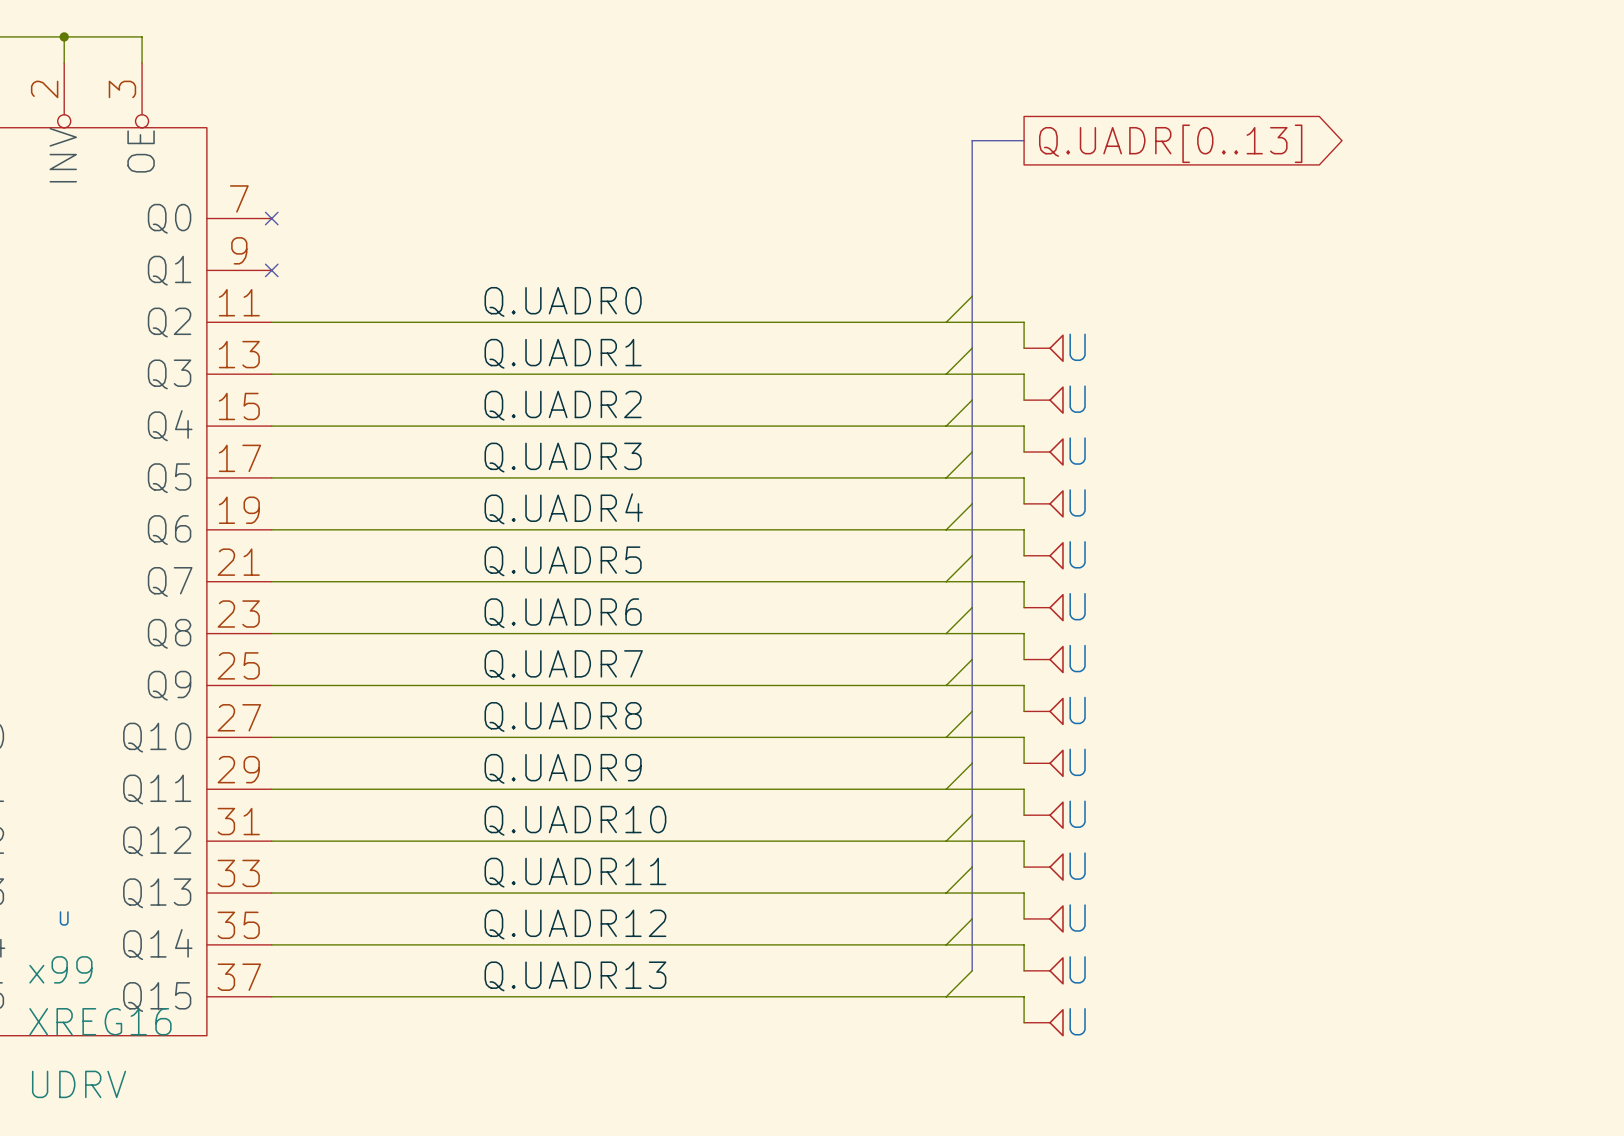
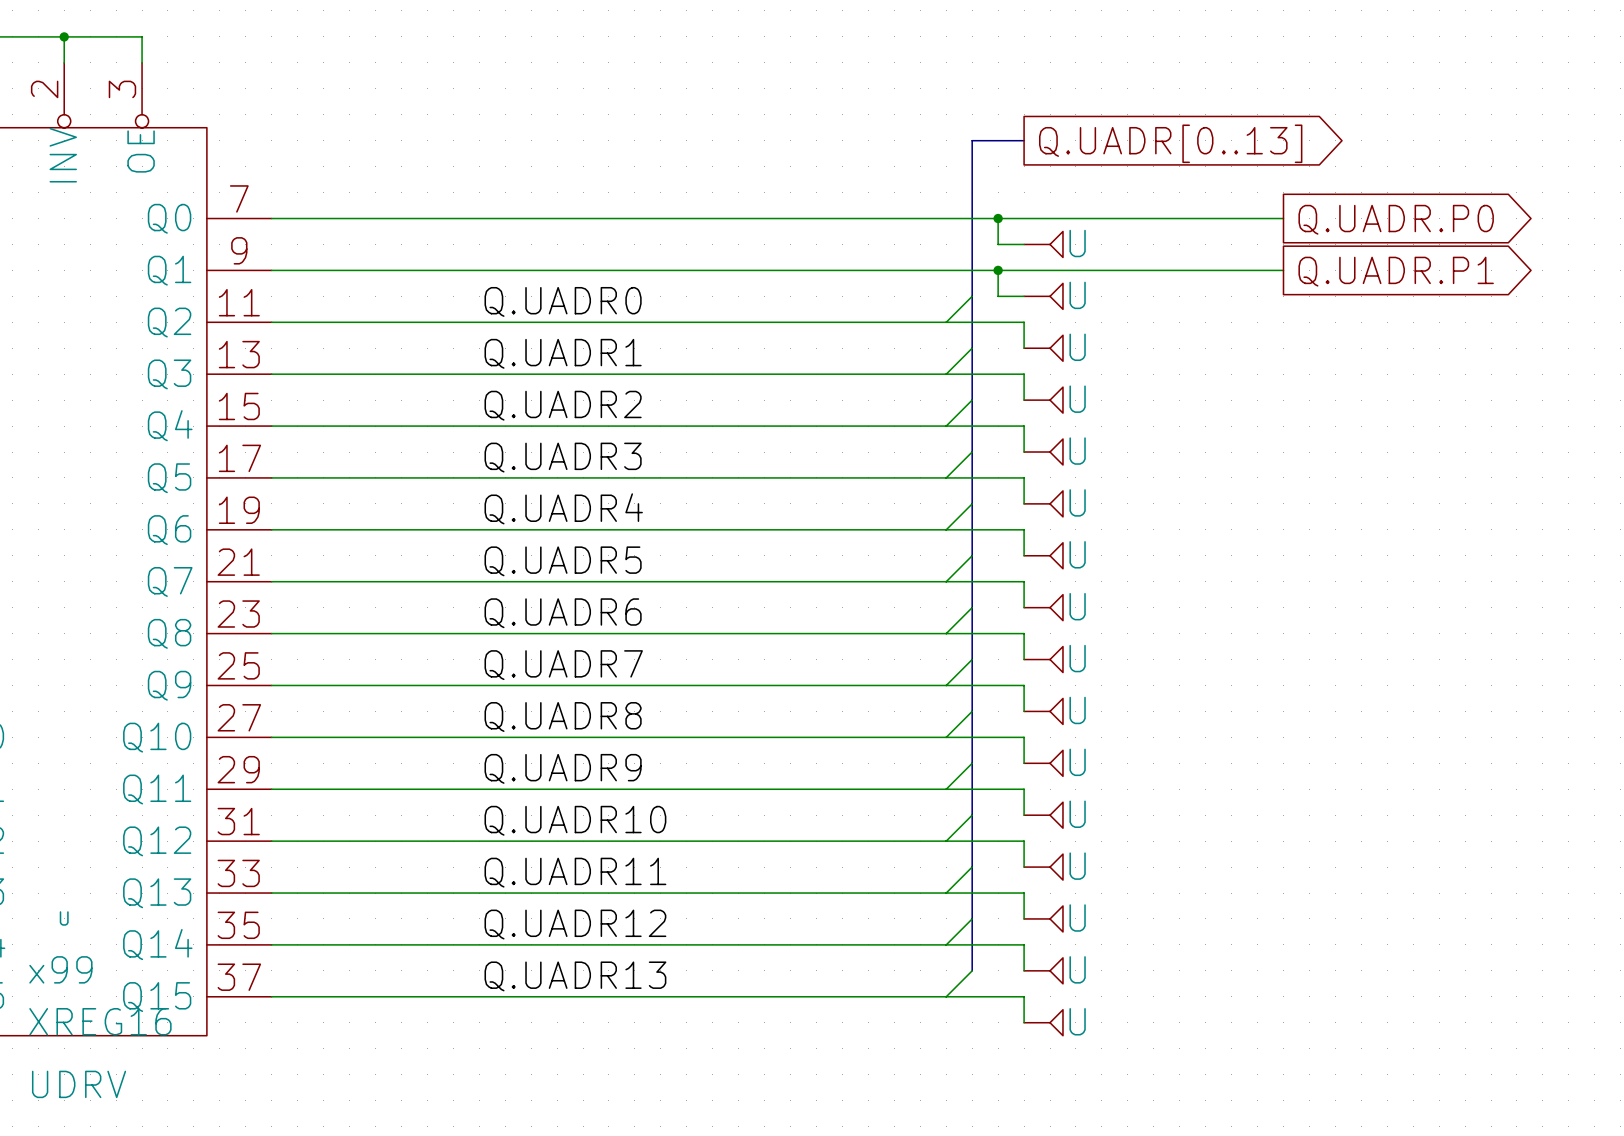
wire: none -> (271, 218) (1283, 218)
no-connect mark: (271, 218) -> none
wire: none -> (998, 218) (998, 244) (1024, 244)
junction: none -> (998, 218)
global label: none -> Q.UADR.P0 (1396, 219)
U: none -> (1043, 244)
wire: none -> (271, 270) (1283, 270)
no-connect mark: (271, 270) -> none
wire: none -> (998, 270) (998, 296) (1024, 296)
junction: none -> (998, 270)
global label: none -> Q.UADR.P1 (1396, 271)
U: none -> (1043, 296)

